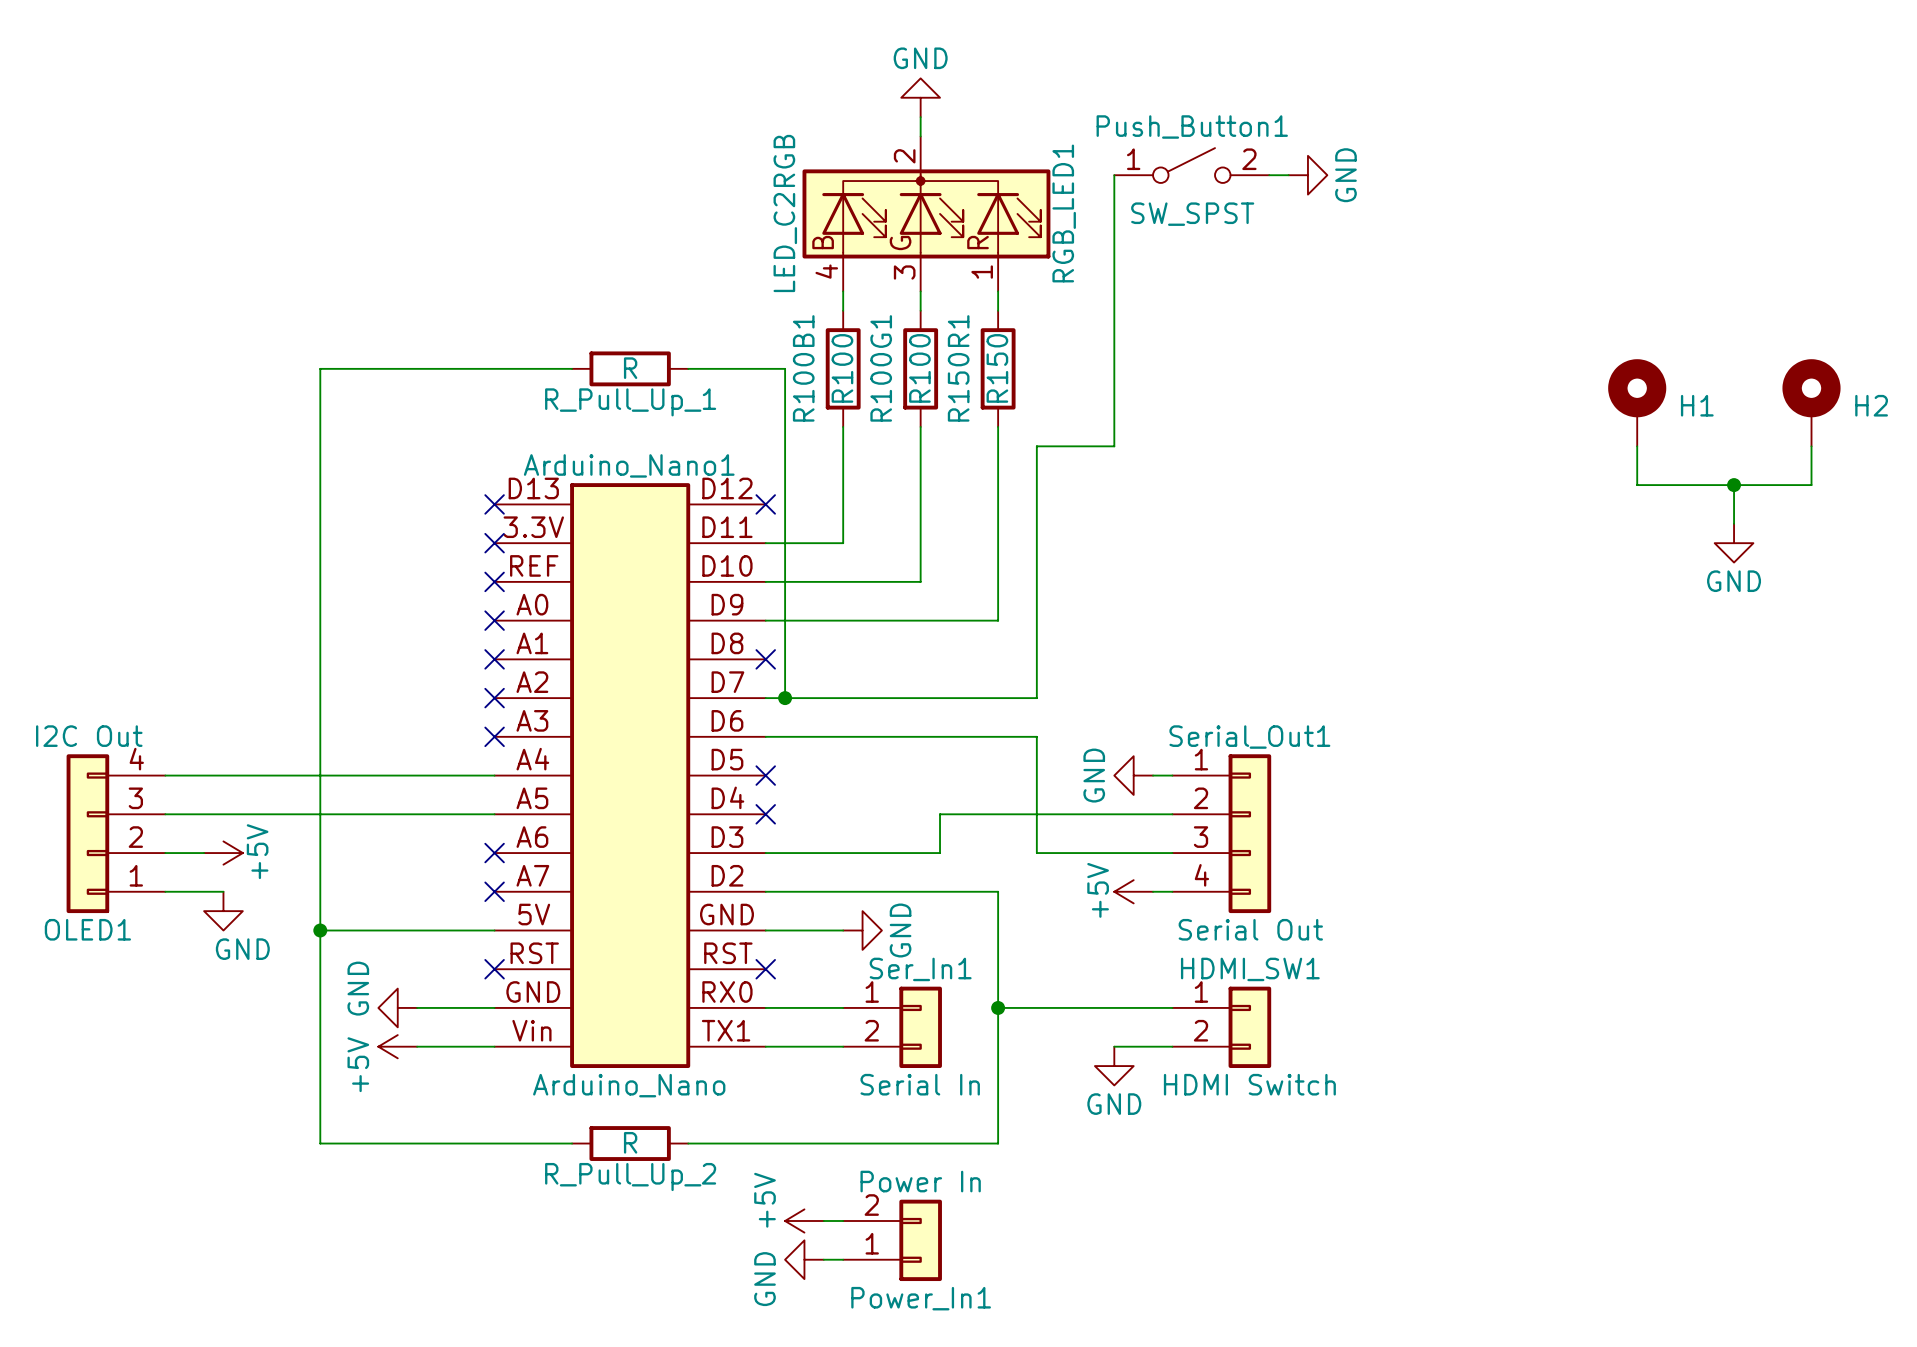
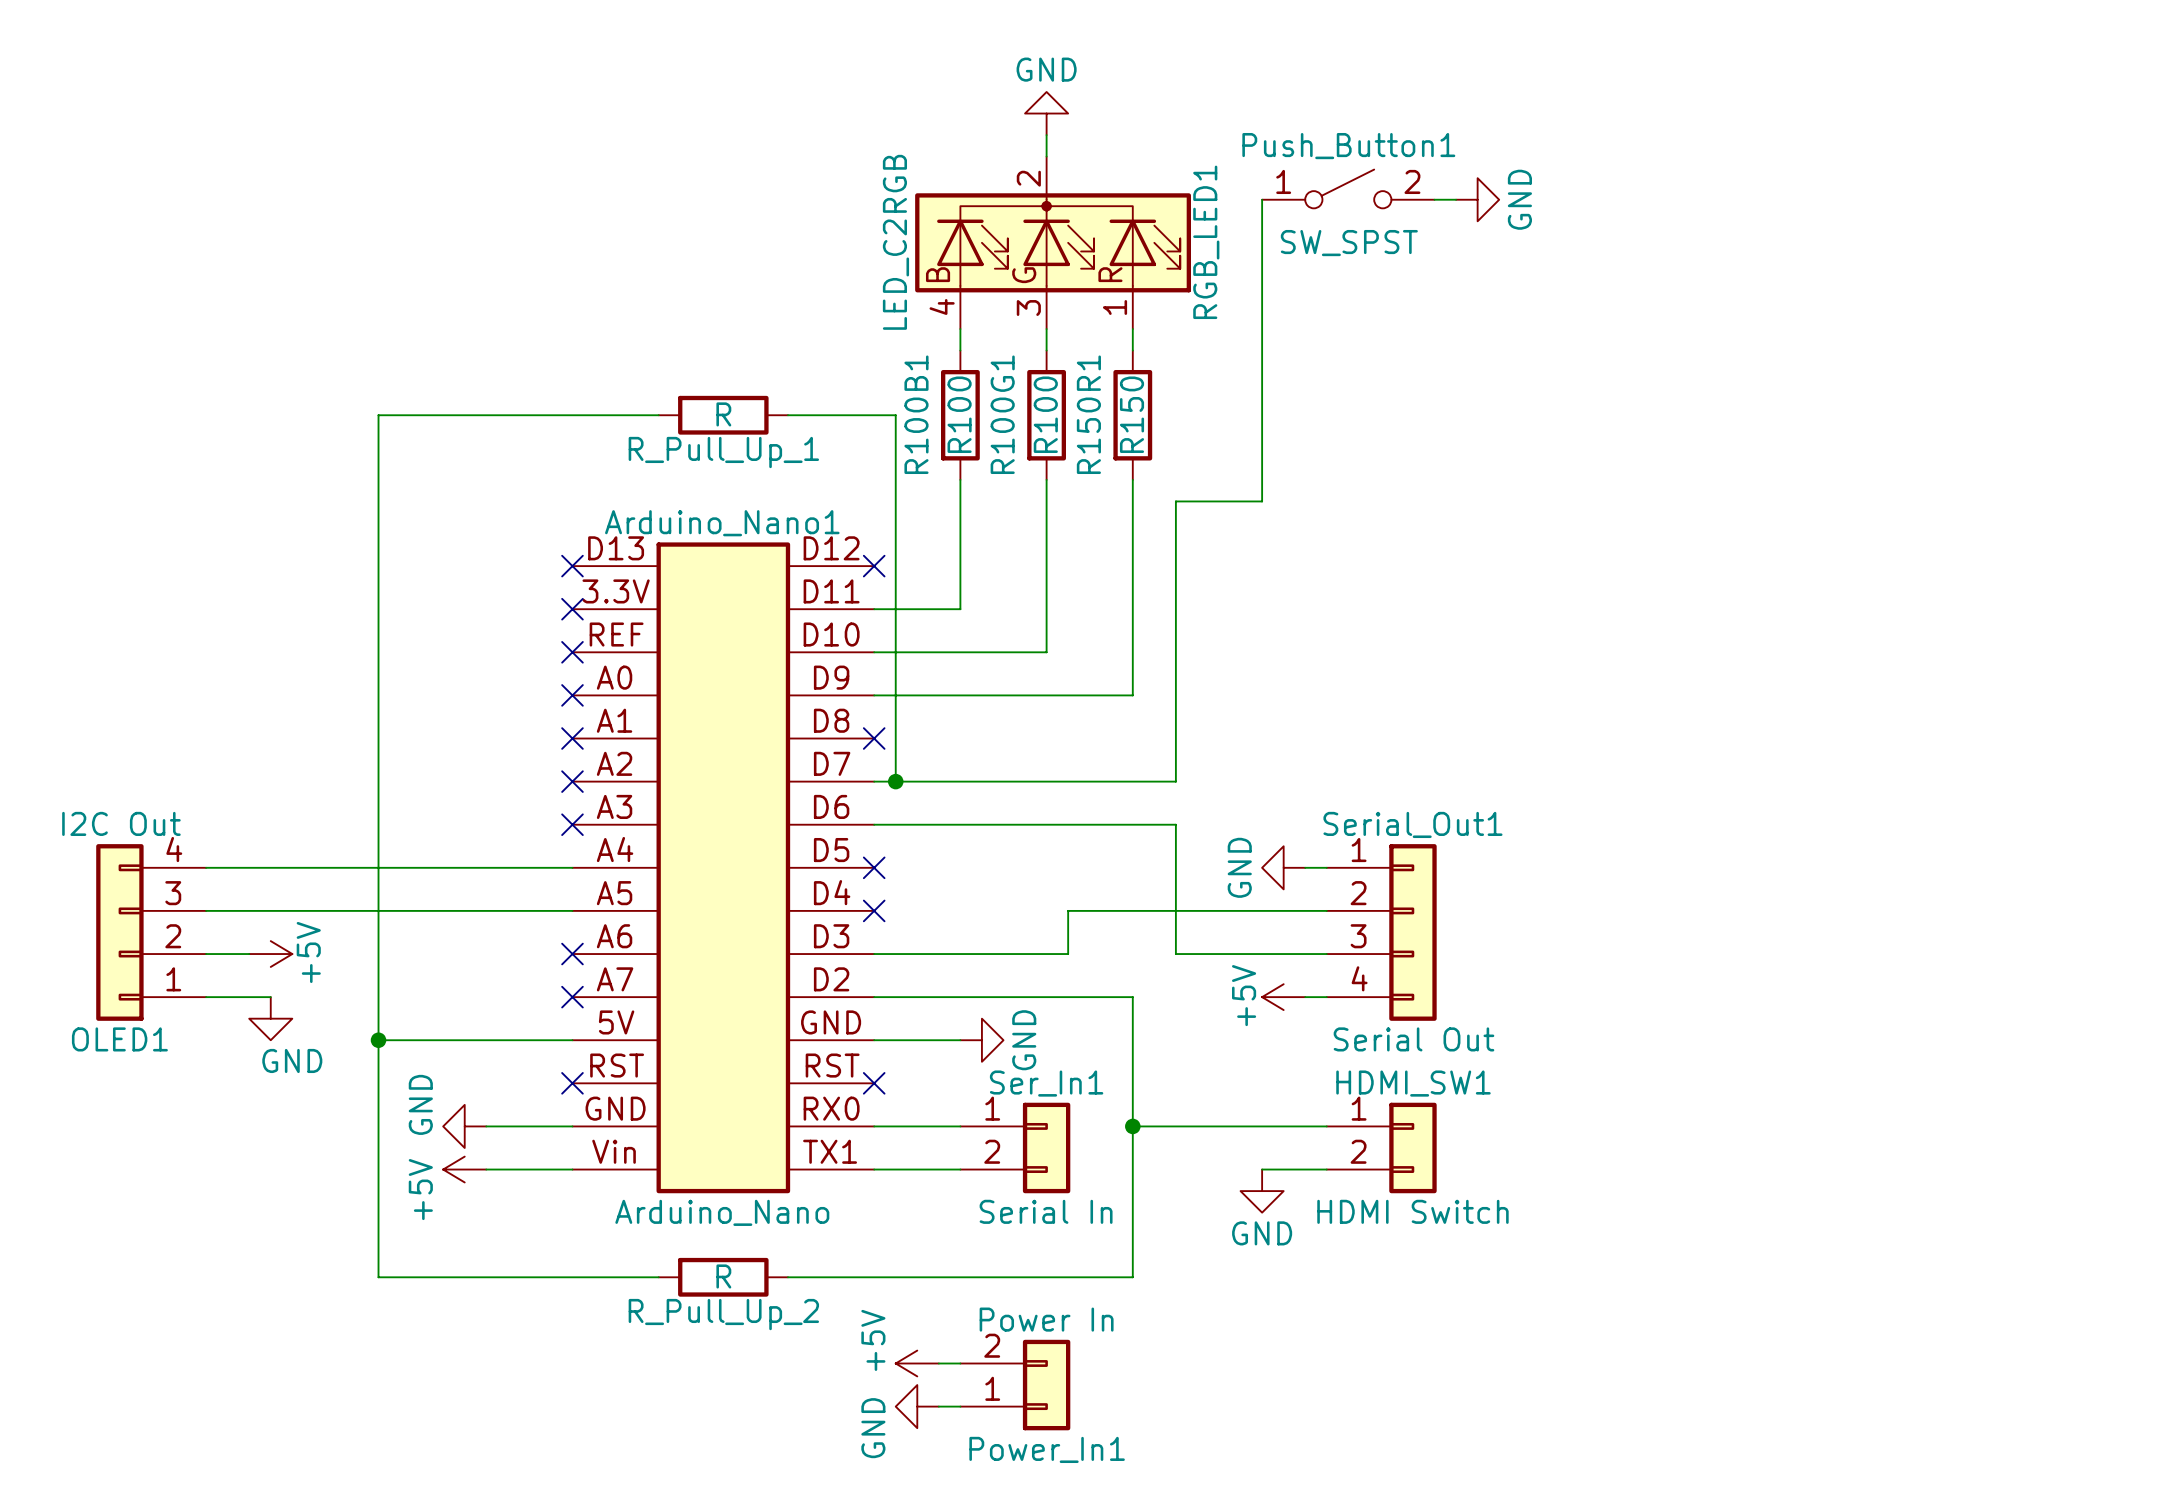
H1: (1637, 402) -> none
H2: (1811, 402) -> none
wire: (1637, 446) (1637, 485) (1811, 485) (1811, 446) -> none
wire: (1734, 485) (1734, 523) -> none
junction: (1734, 485) -> none
power symbol: GND (1734, 543) -> none

